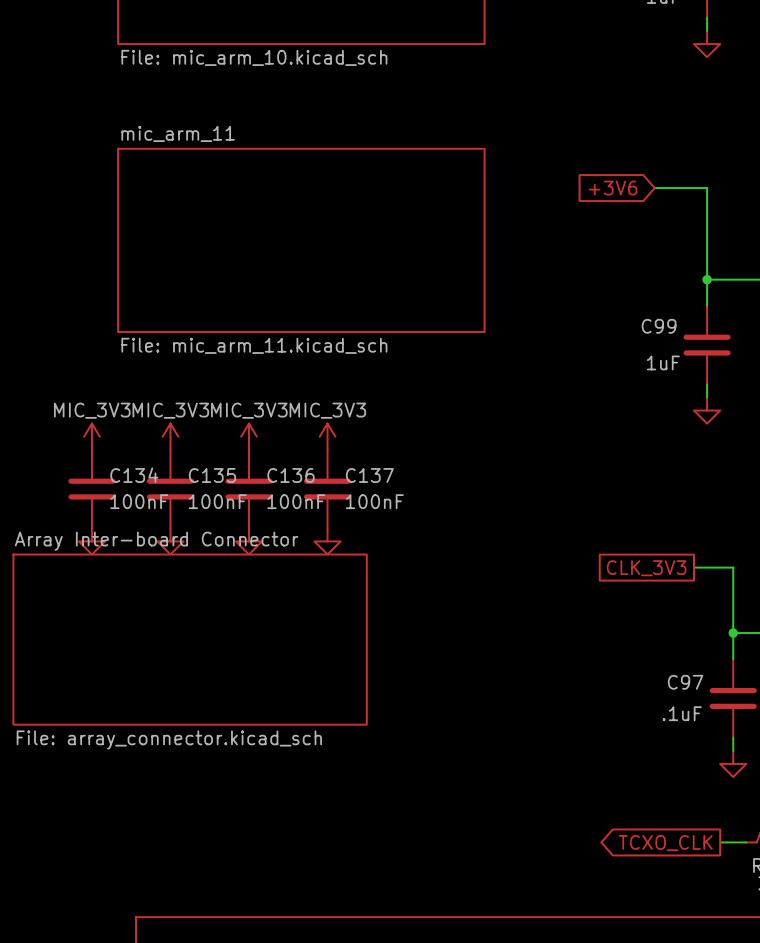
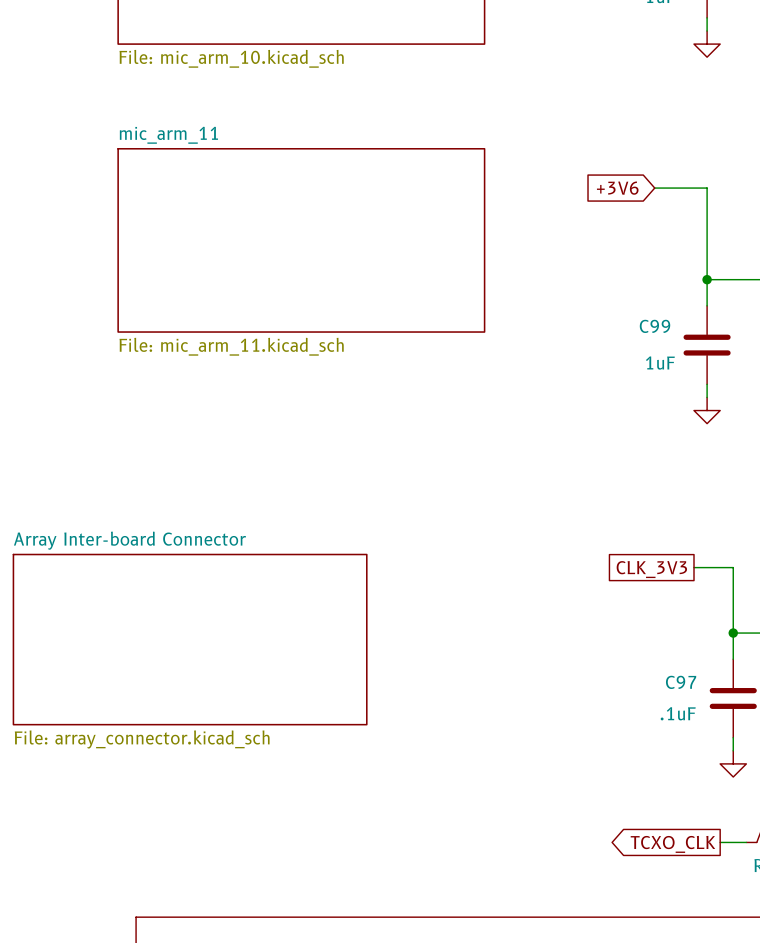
power symbol: MIC_3V3 (91, 436) -> none
power symbol: MIC_3V3 (170, 436) -> none
power symbol: MIC_3V3 (249, 436) -> none
power symbol: MIC_3V3 (327, 436) -> none
C134: 100nF (91, 489) -> none
C135: 100nF (170, 489) -> none
C136: 100nF (249, 489) -> none
C137: 100nF (327, 489) -> none
power symbol: (91, 541) -> none
power symbol: (170, 541) -> none
power symbol: (249, 541) -> none
power symbol: (327, 541) -> none

